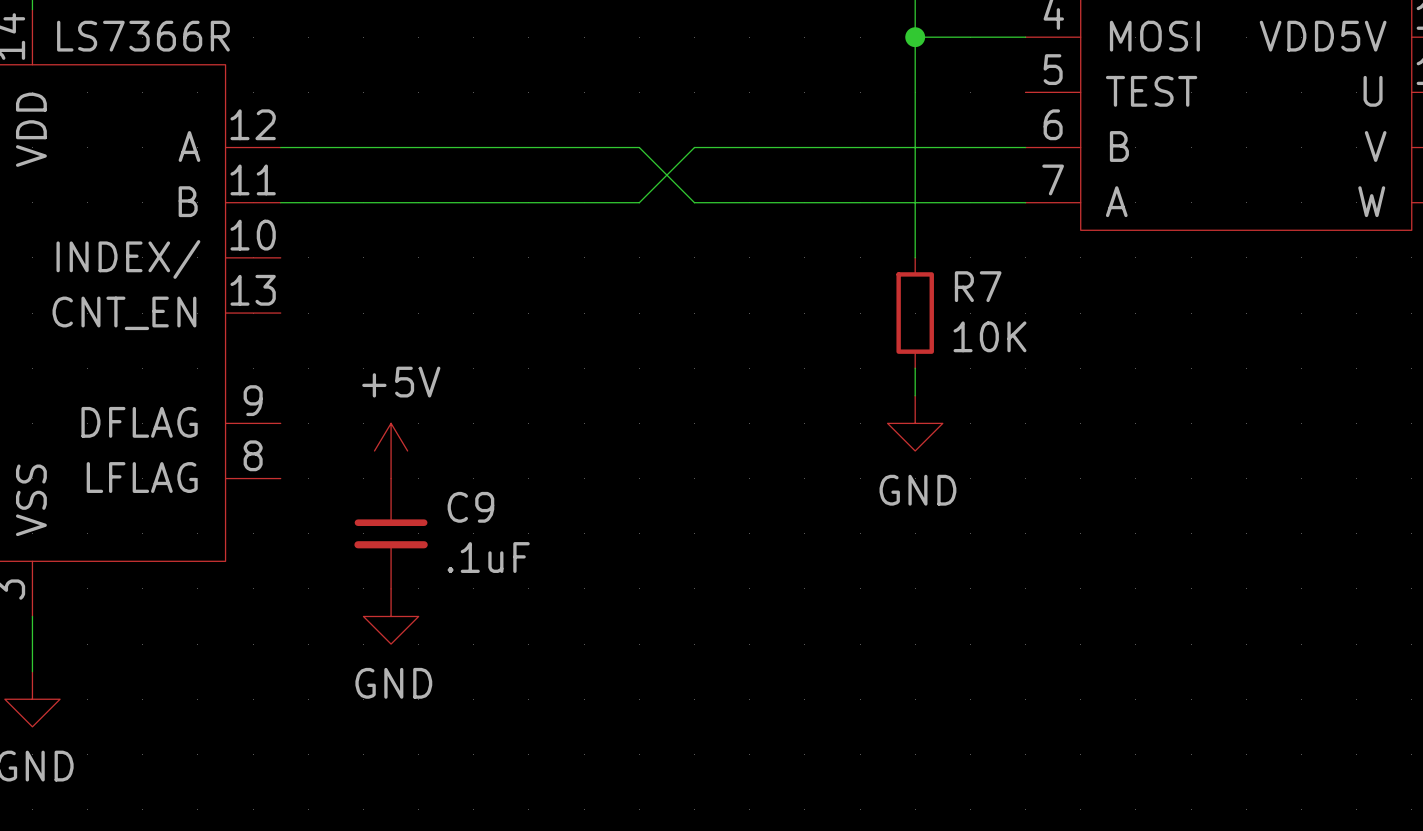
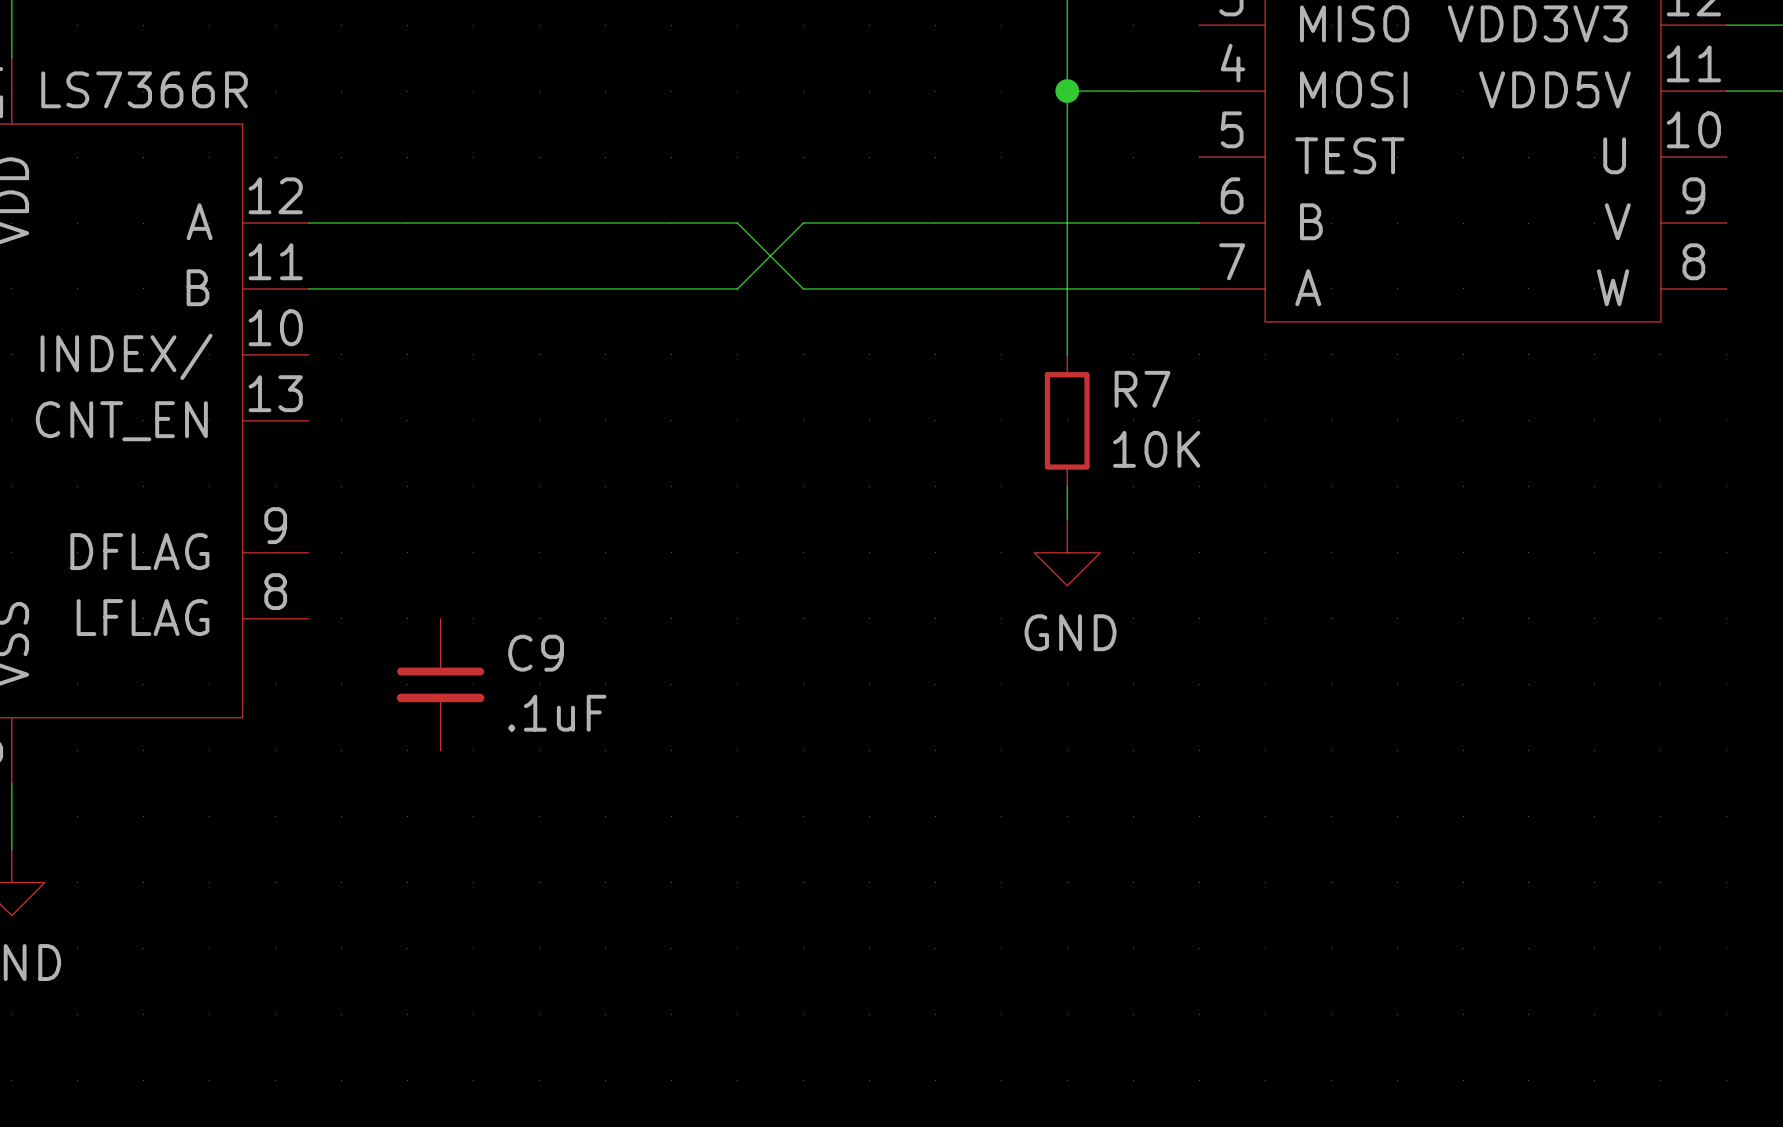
power symbol: +5V (391, 450) -> none
power symbol: GND (391, 616) -> none

